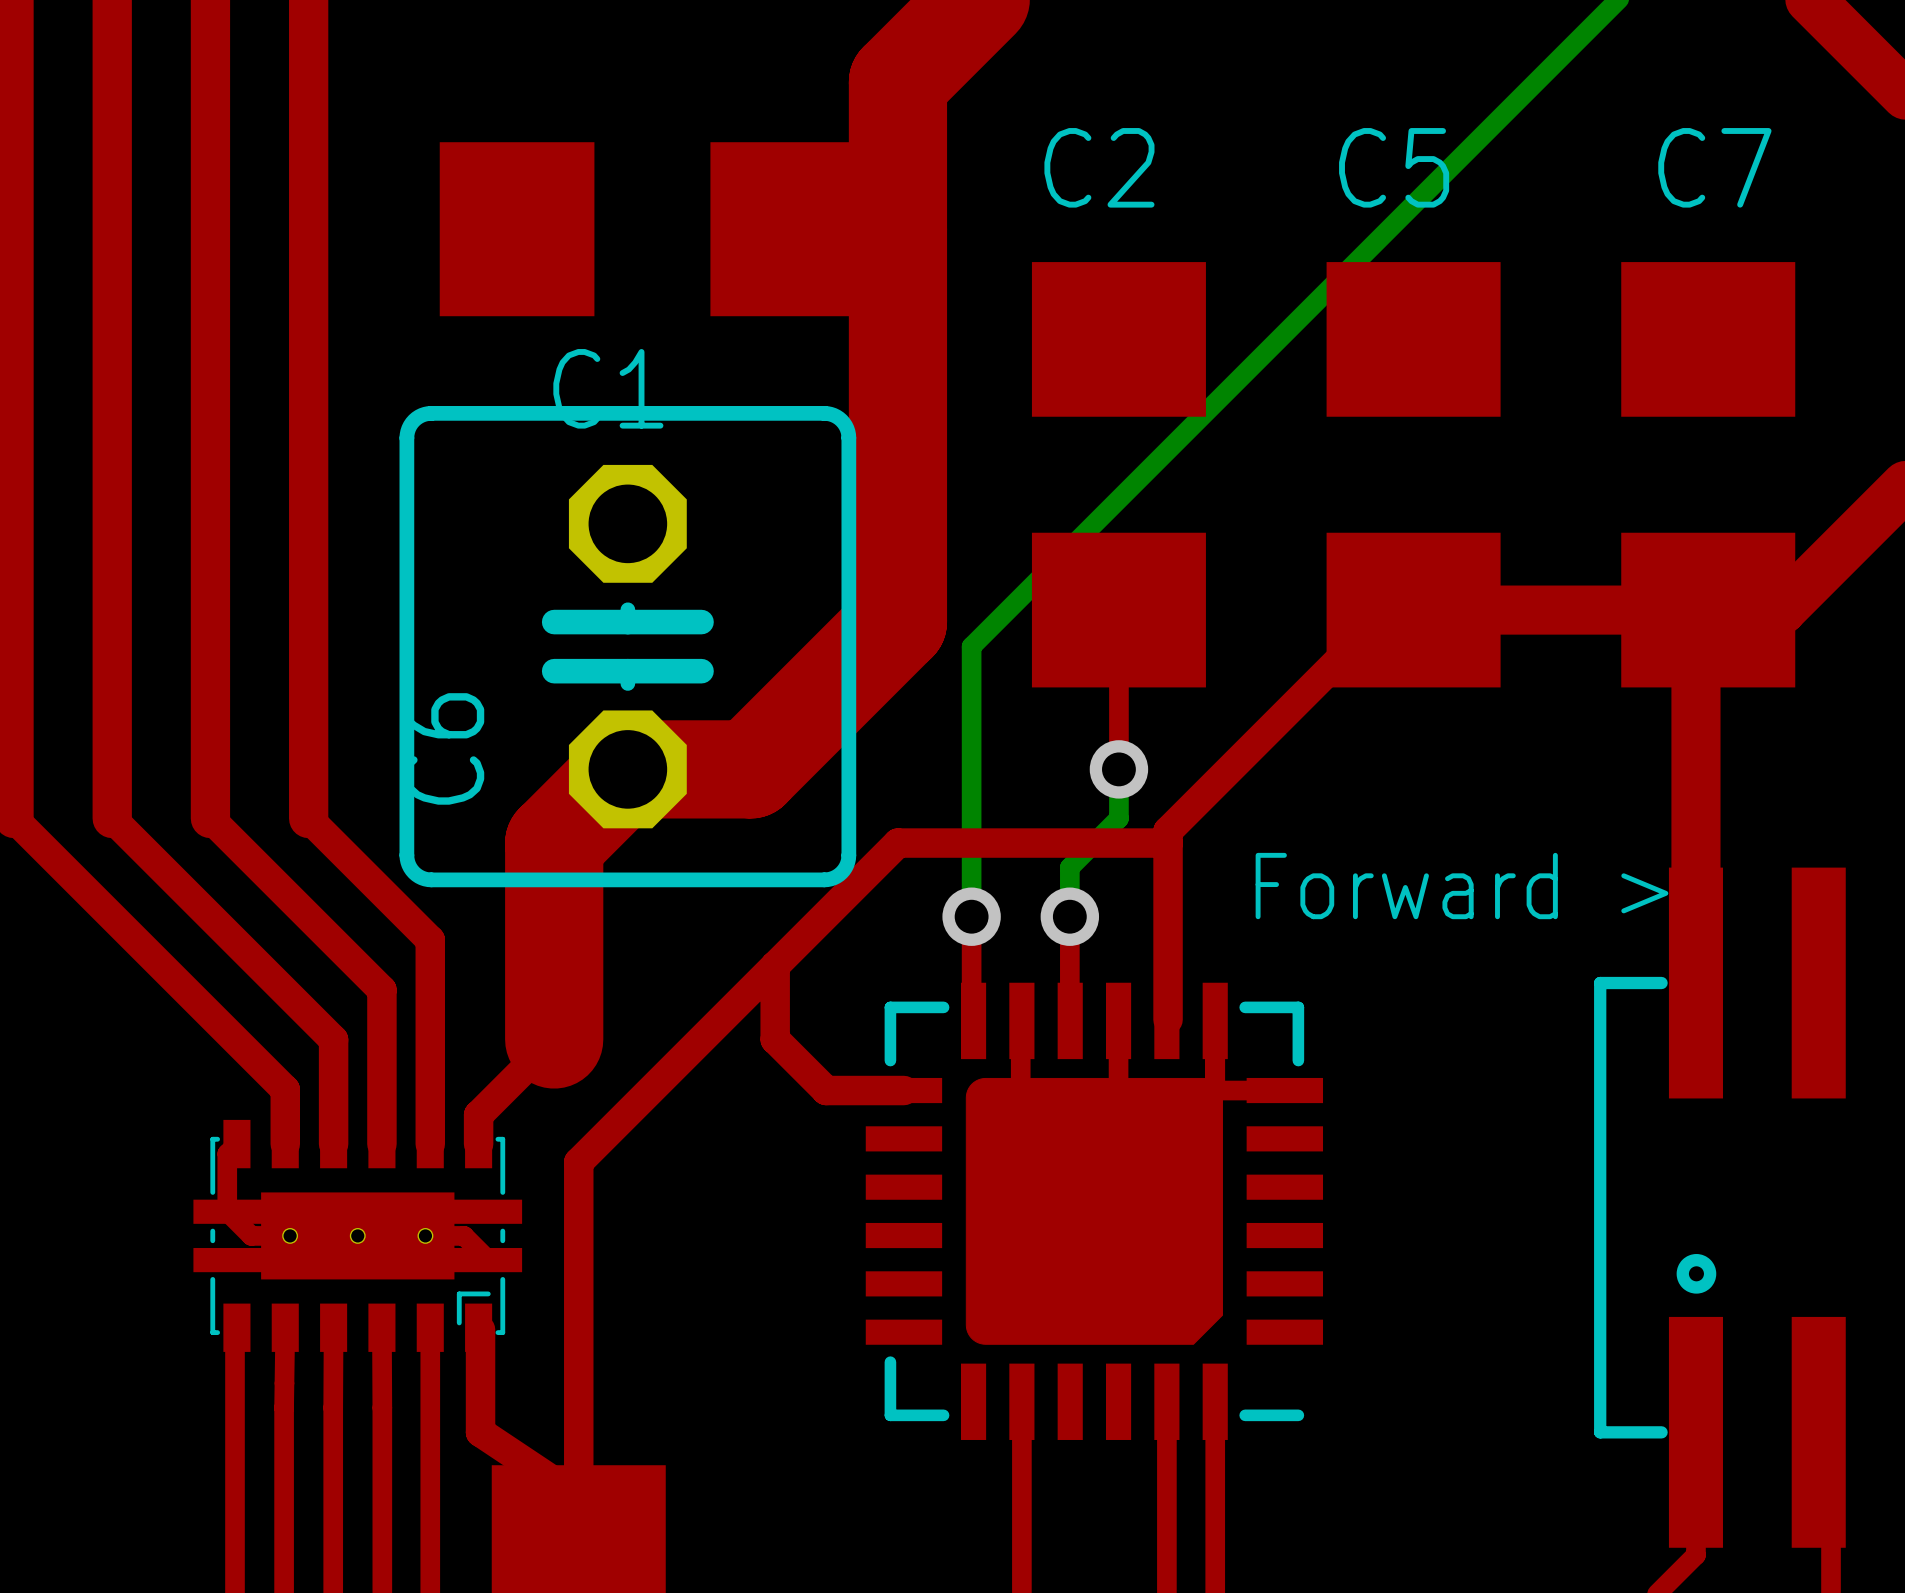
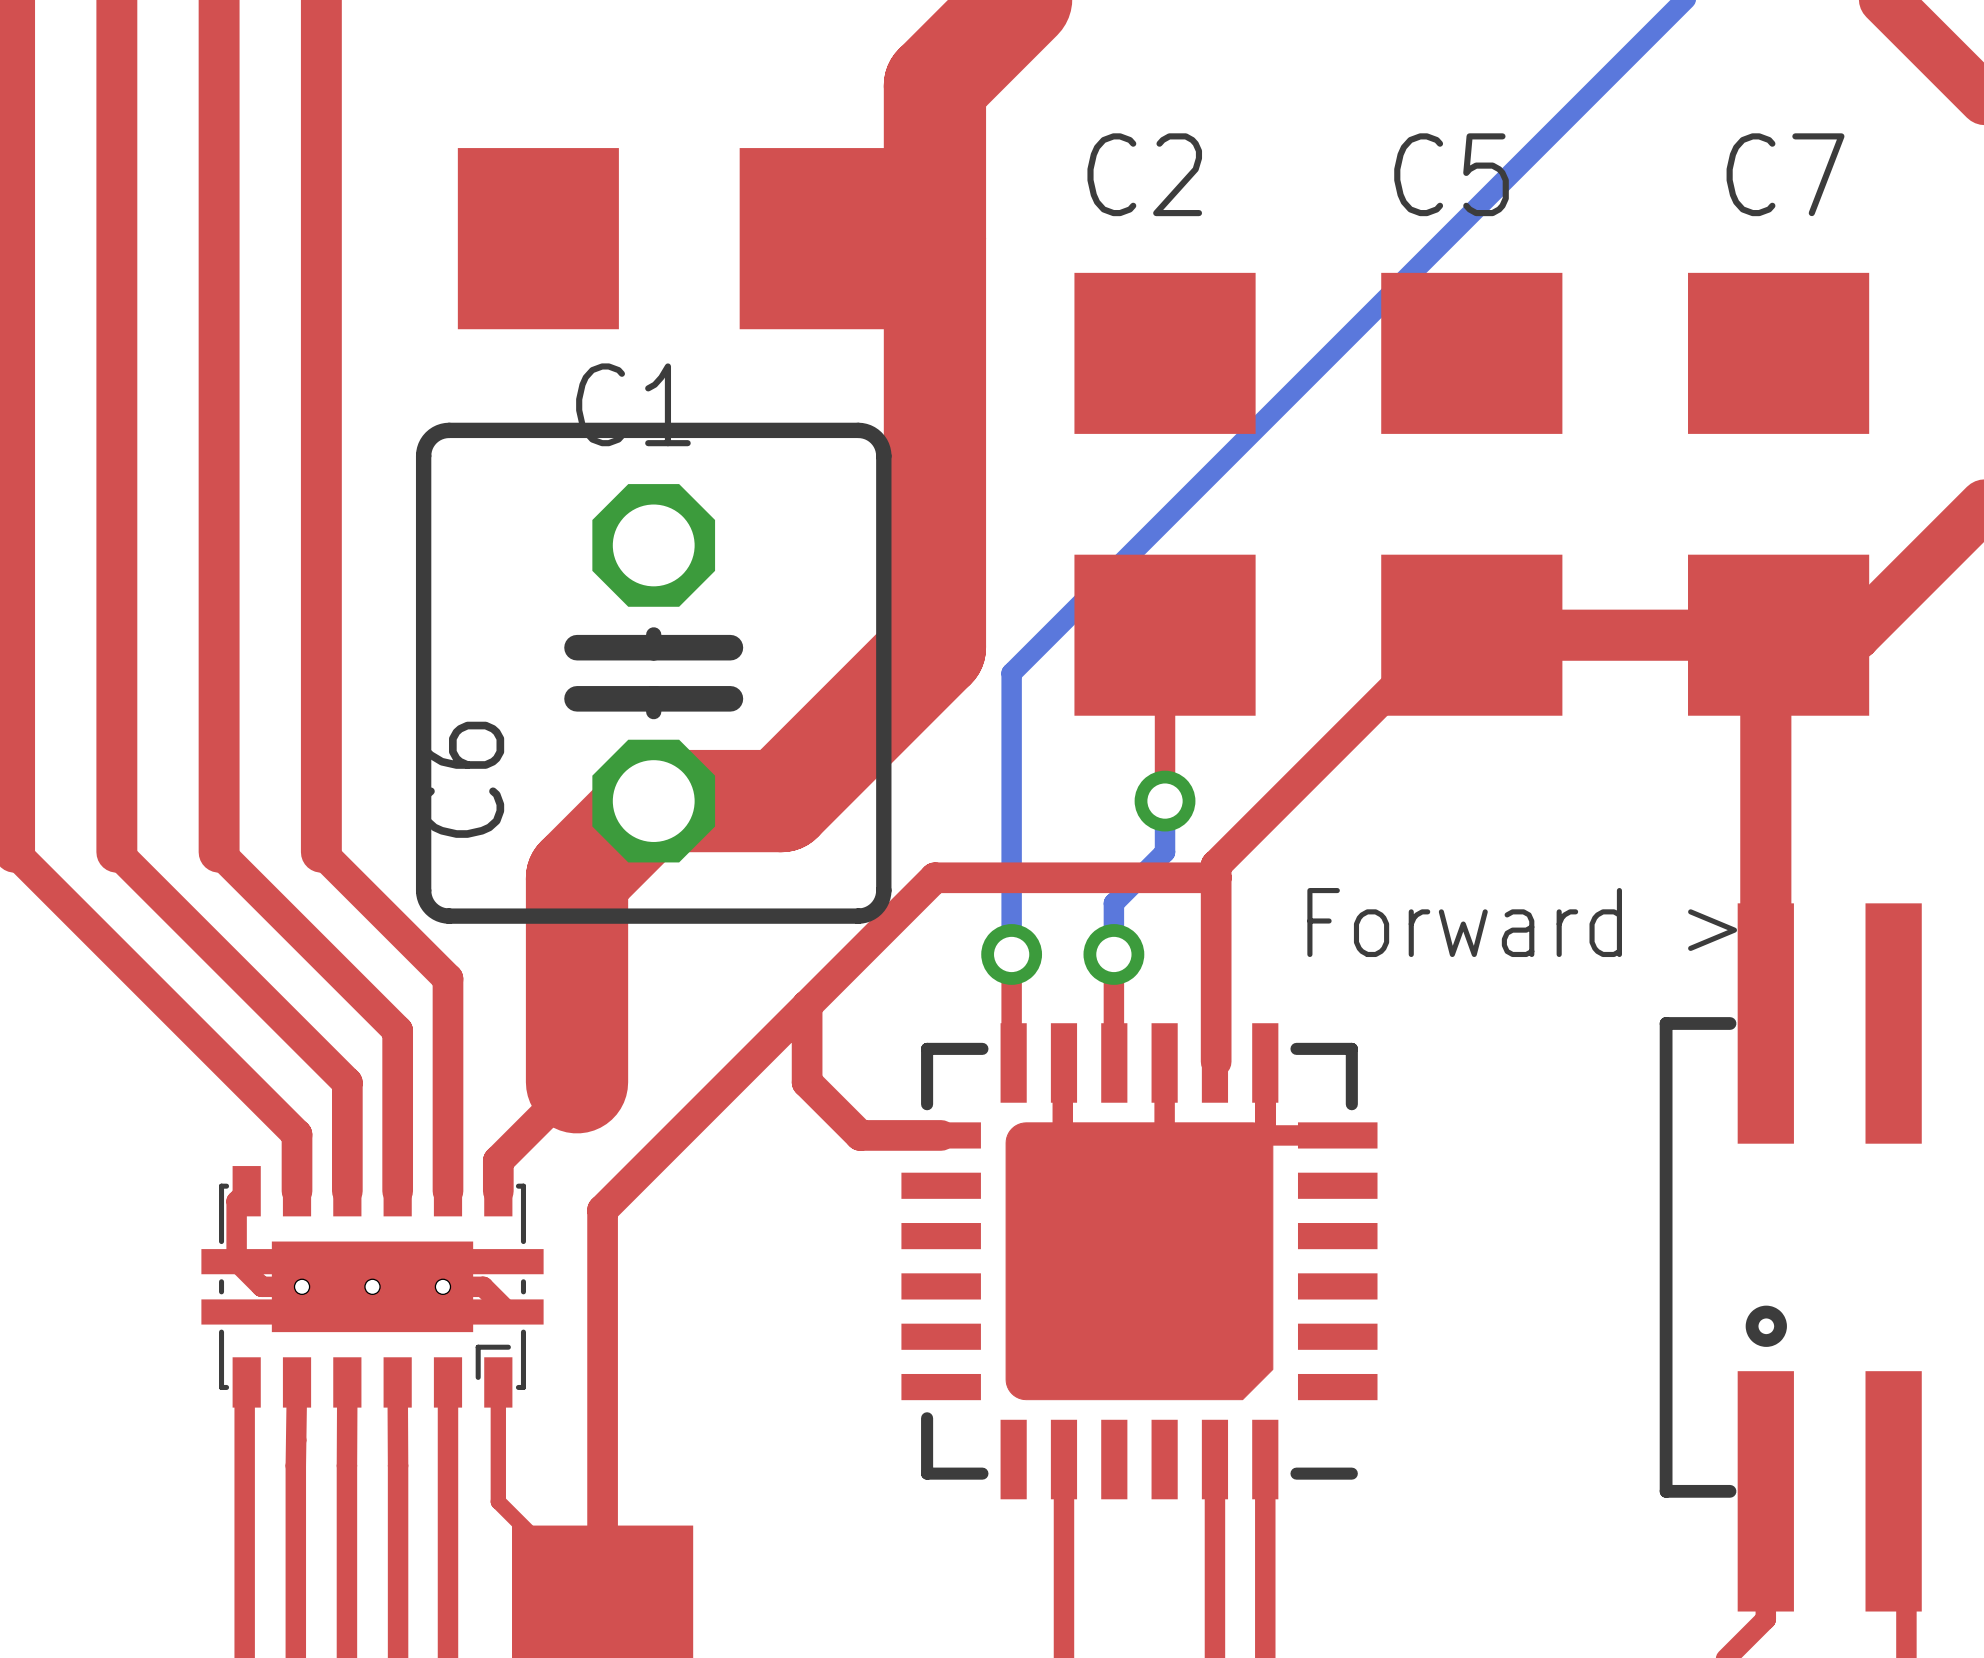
top track: (478, 1327) (480, 1329) (480, 1432) (578, 1497) -> (498, 1382) (498, 1501) (602, 1606)

